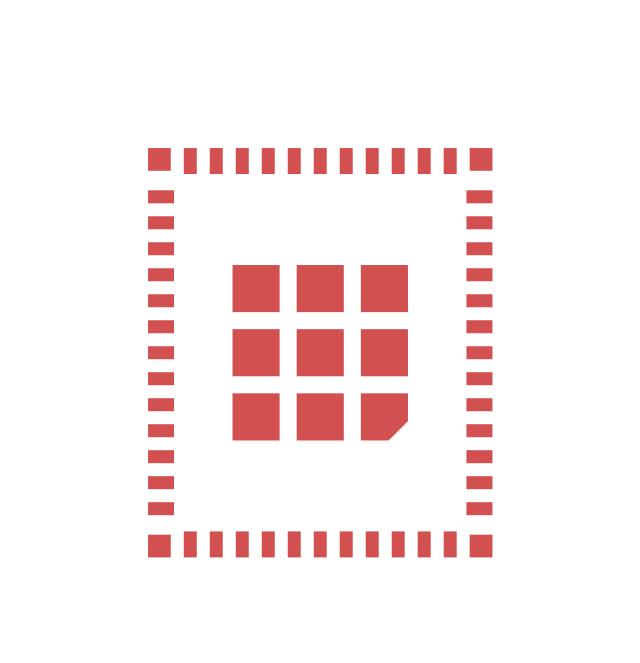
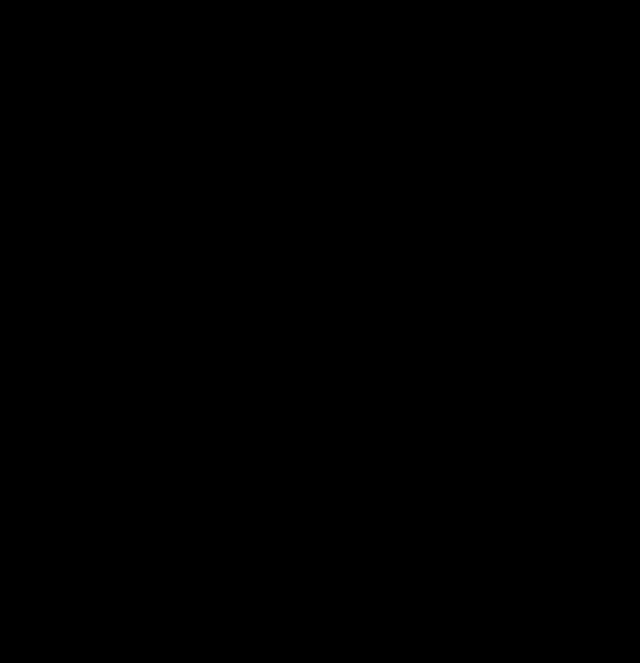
part: (320, 352) -> none

